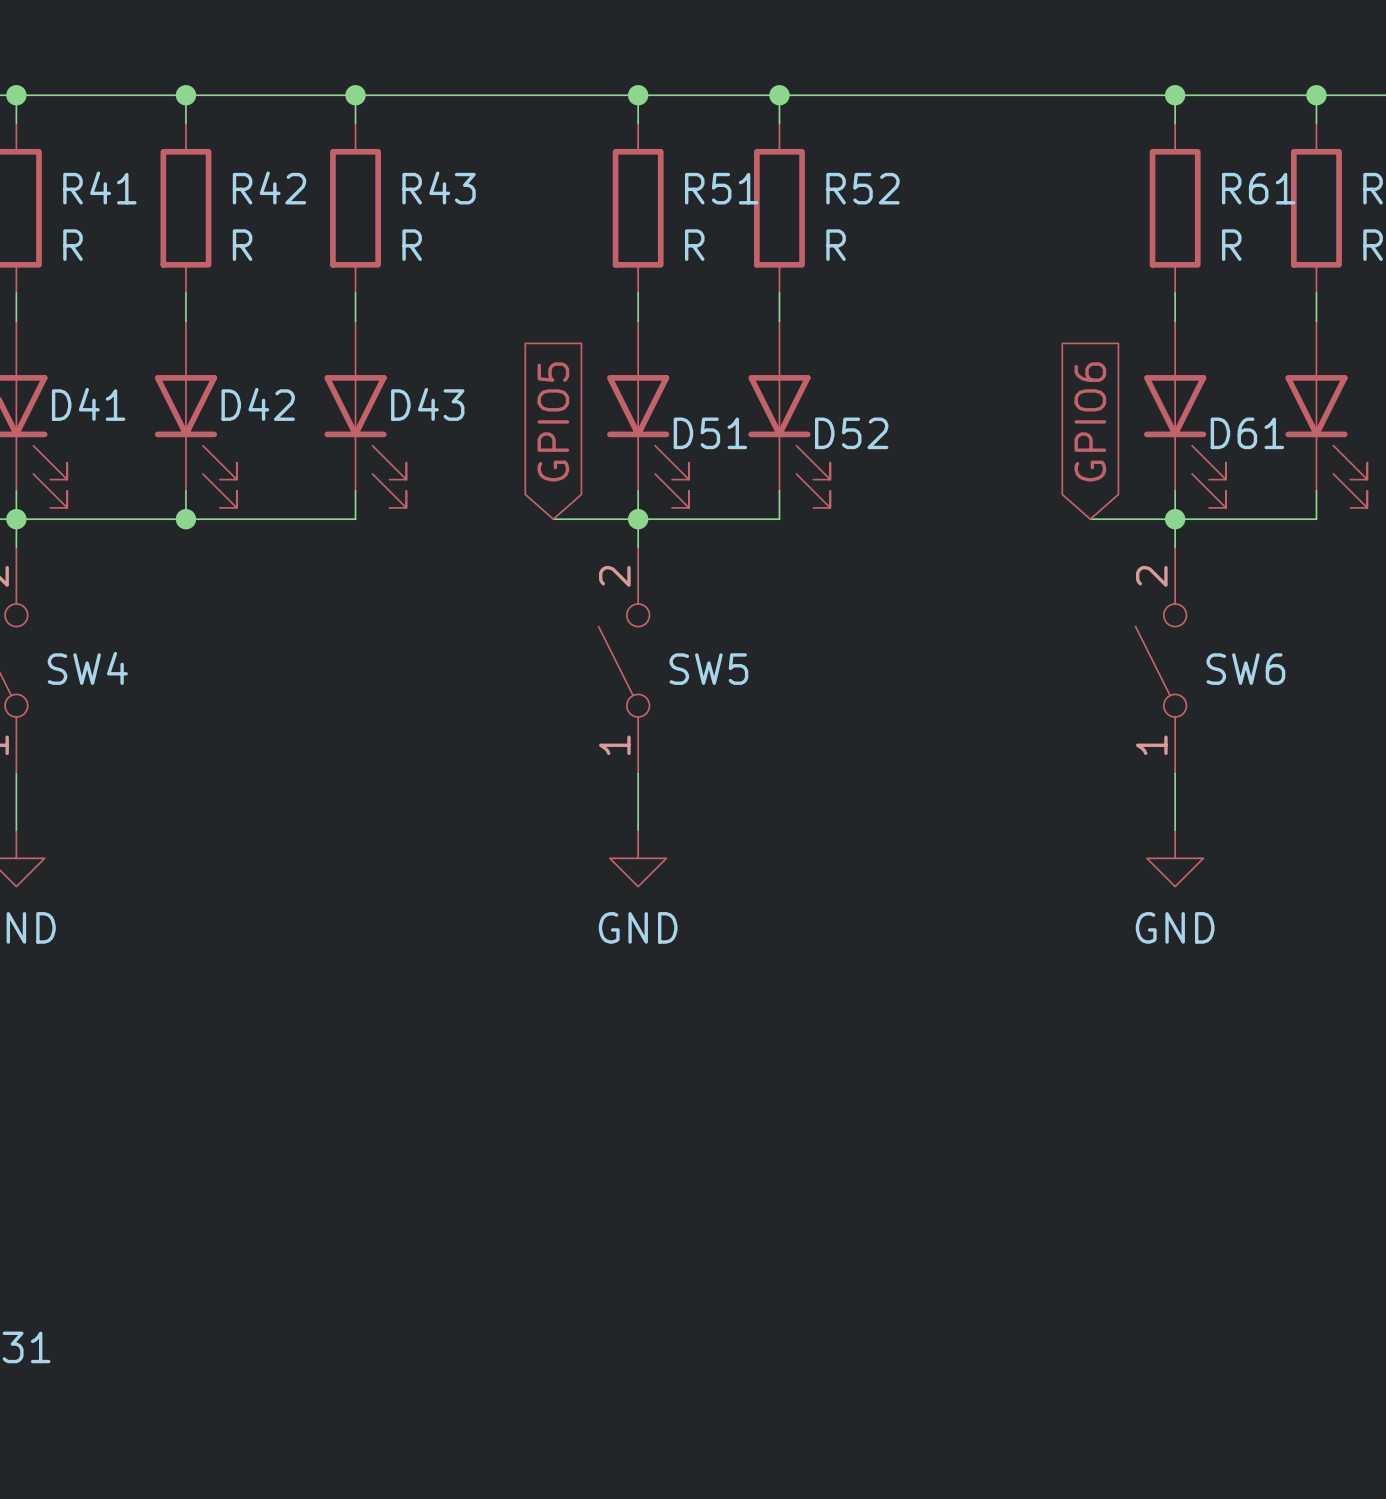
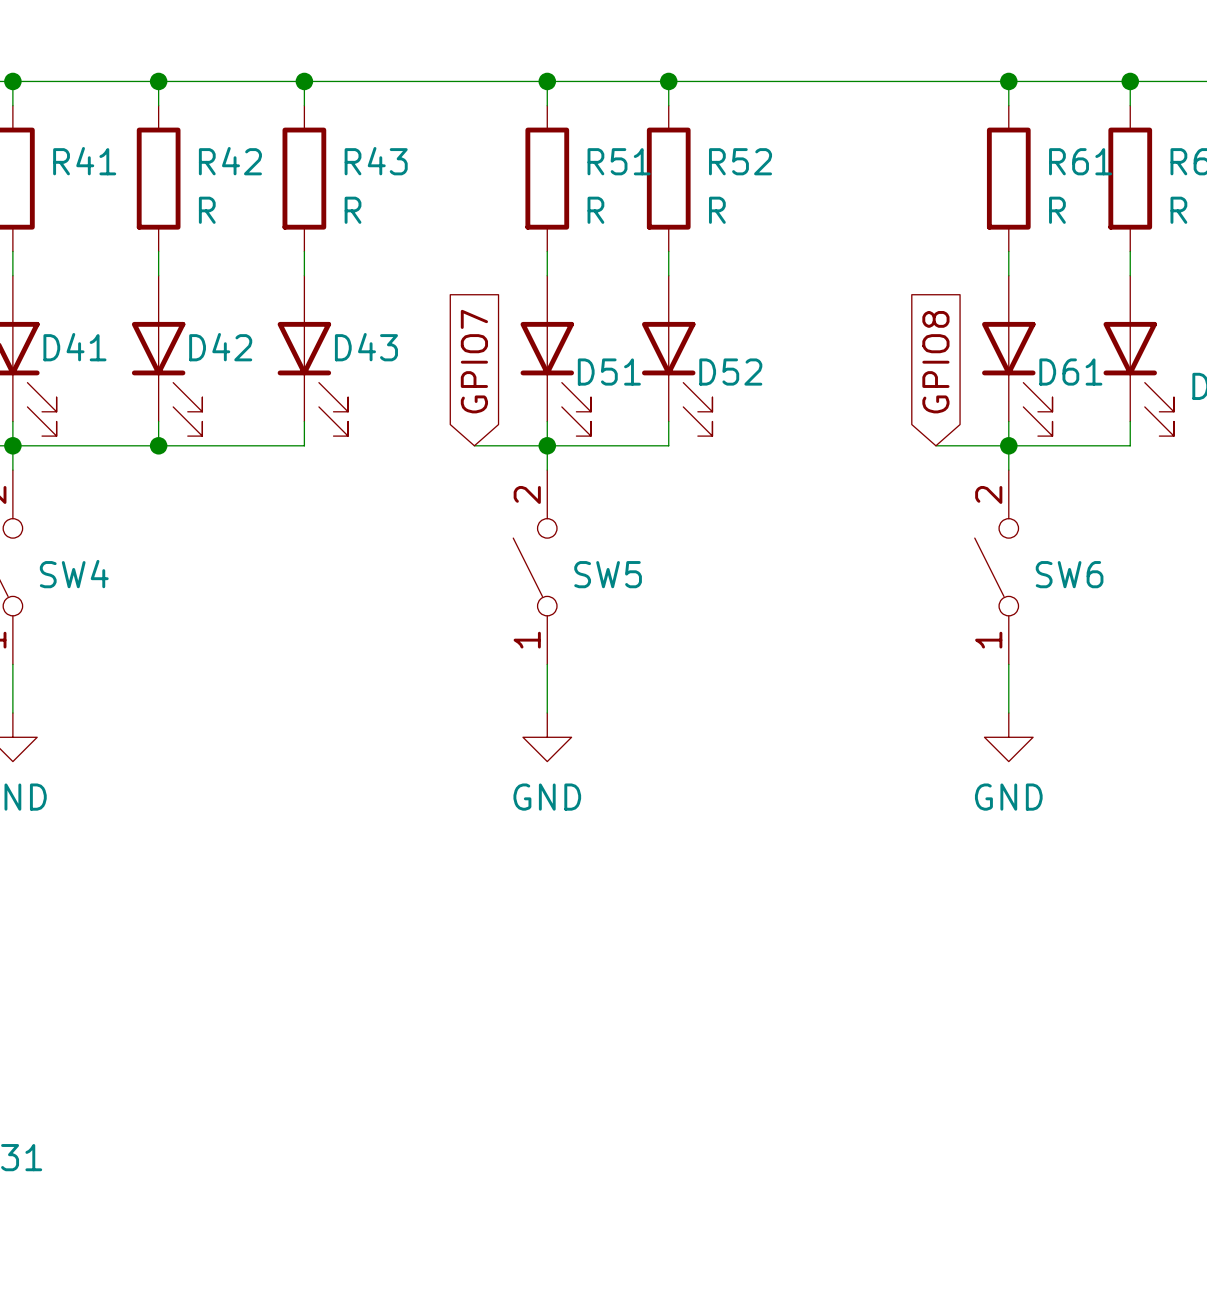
R41 value: R (72, 245) -> none
global label: GPIO5 (553, 421) -> GPIO7 (474, 361)
global label: GPIO6 (1090, 421) -> GPIO8 (935, 362)

